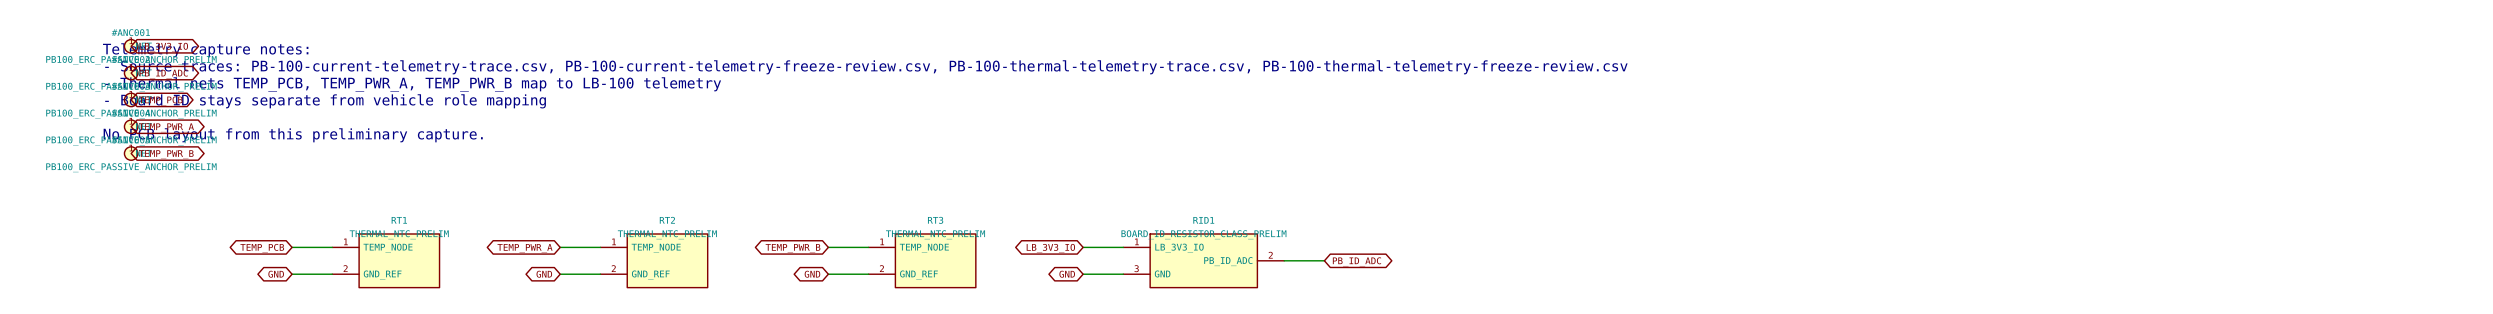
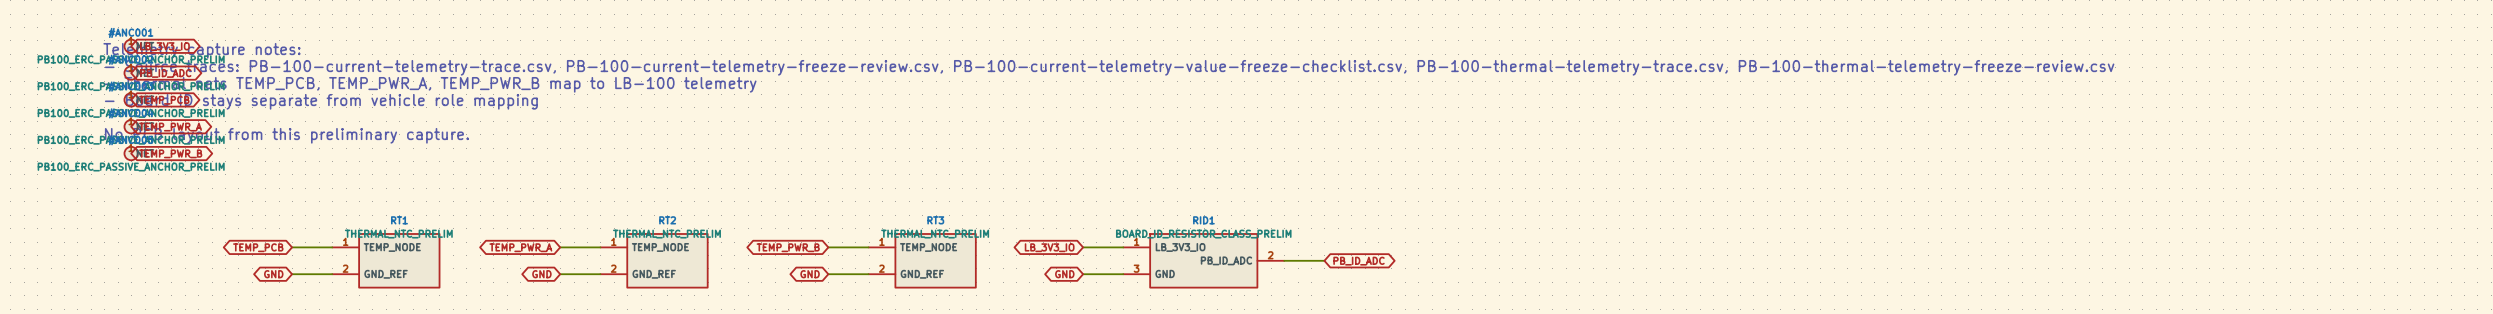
text: - Source traces: PB-100-current-telemetry-trace.csv, PB-100-current-telemetry-freeze-review.csv, PB-100-thermal-telemetry-trace.csv, PB-100-thermal-telemetry-freeze-review.csv (866, 67) -> - Source traces: PB-100-current-telemetry-trace.csv, PB-100-current-telemetry-freeze-review.csv, PB-100-current-telemetry-value-freeze-checklist.csv, PB-100-thermal-telemetry-trace.csv, PB-100-thermal-telemetry-freeze-review.csv (1109, 67)

